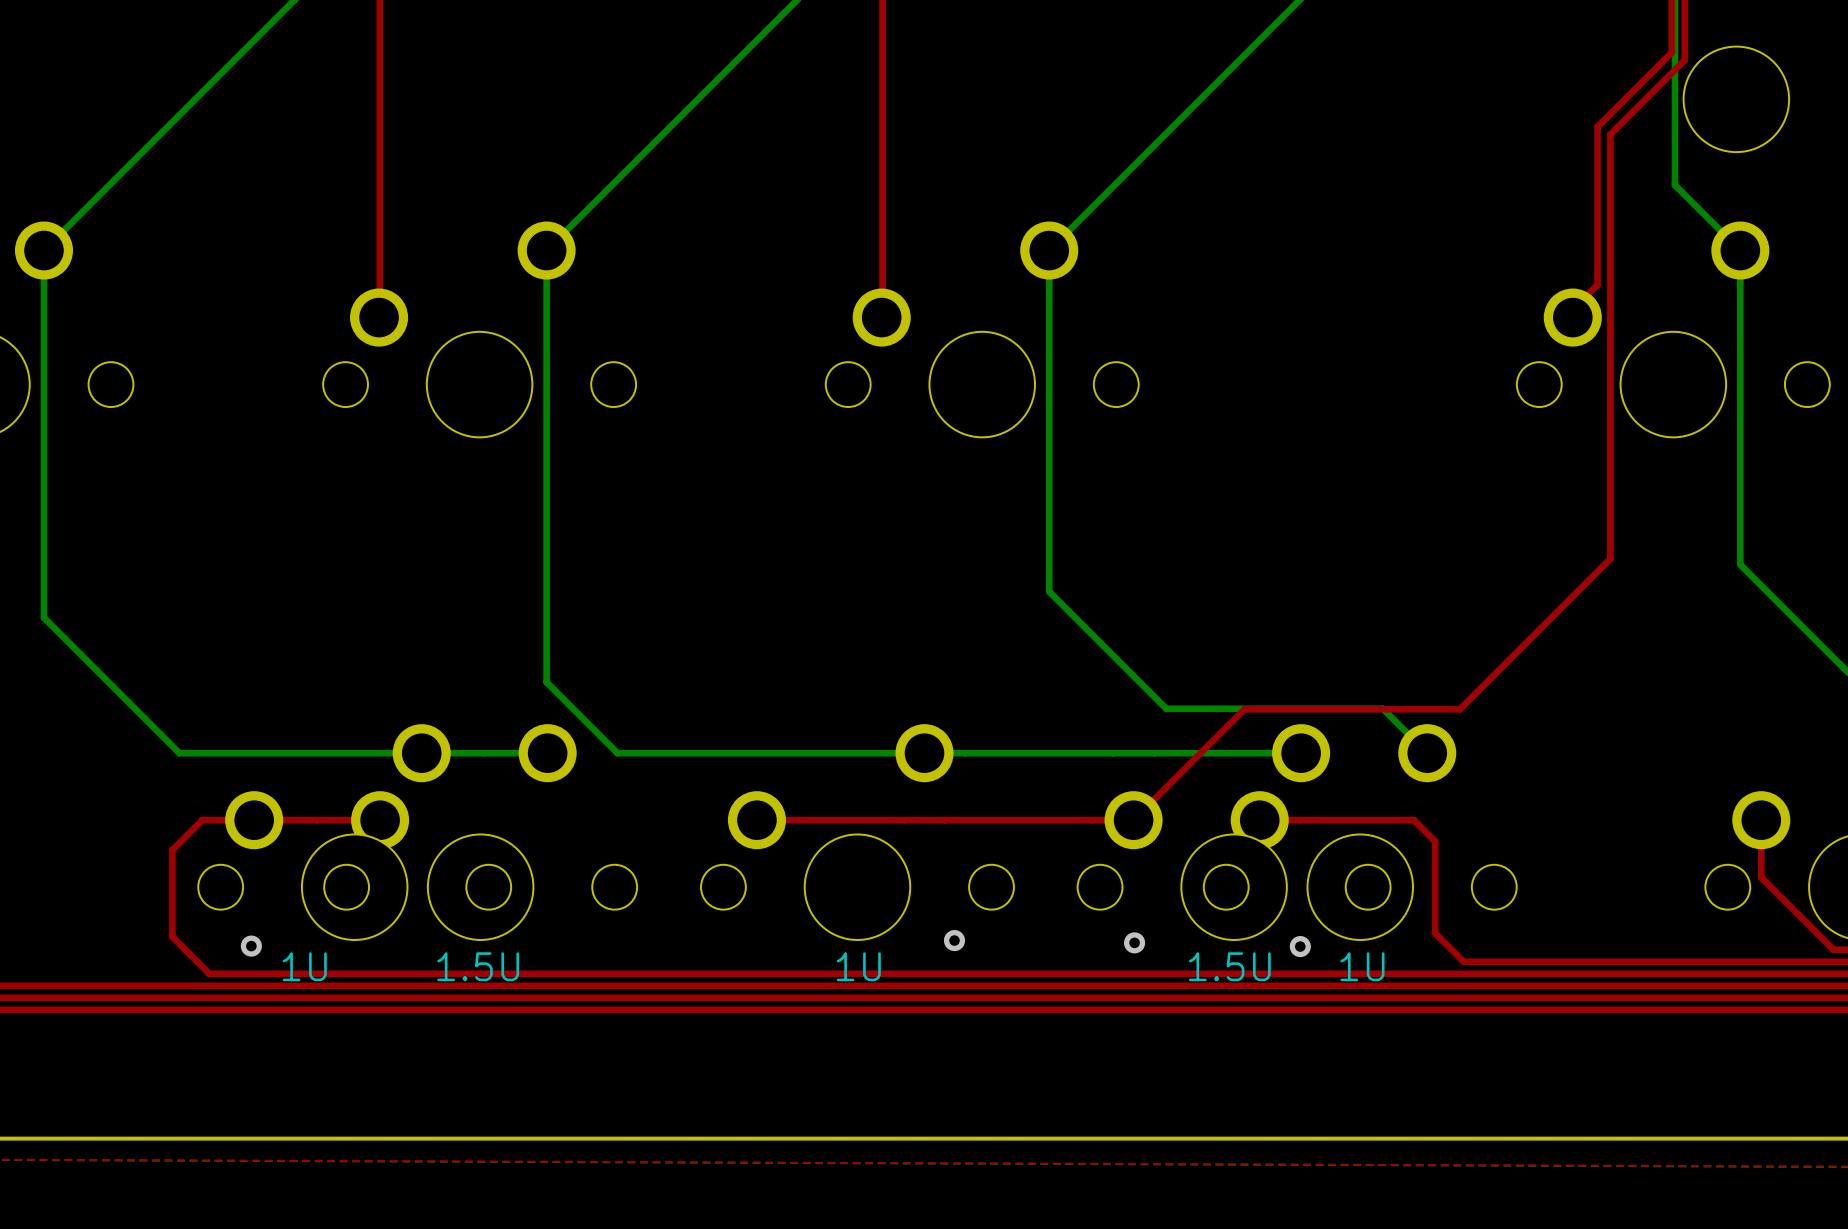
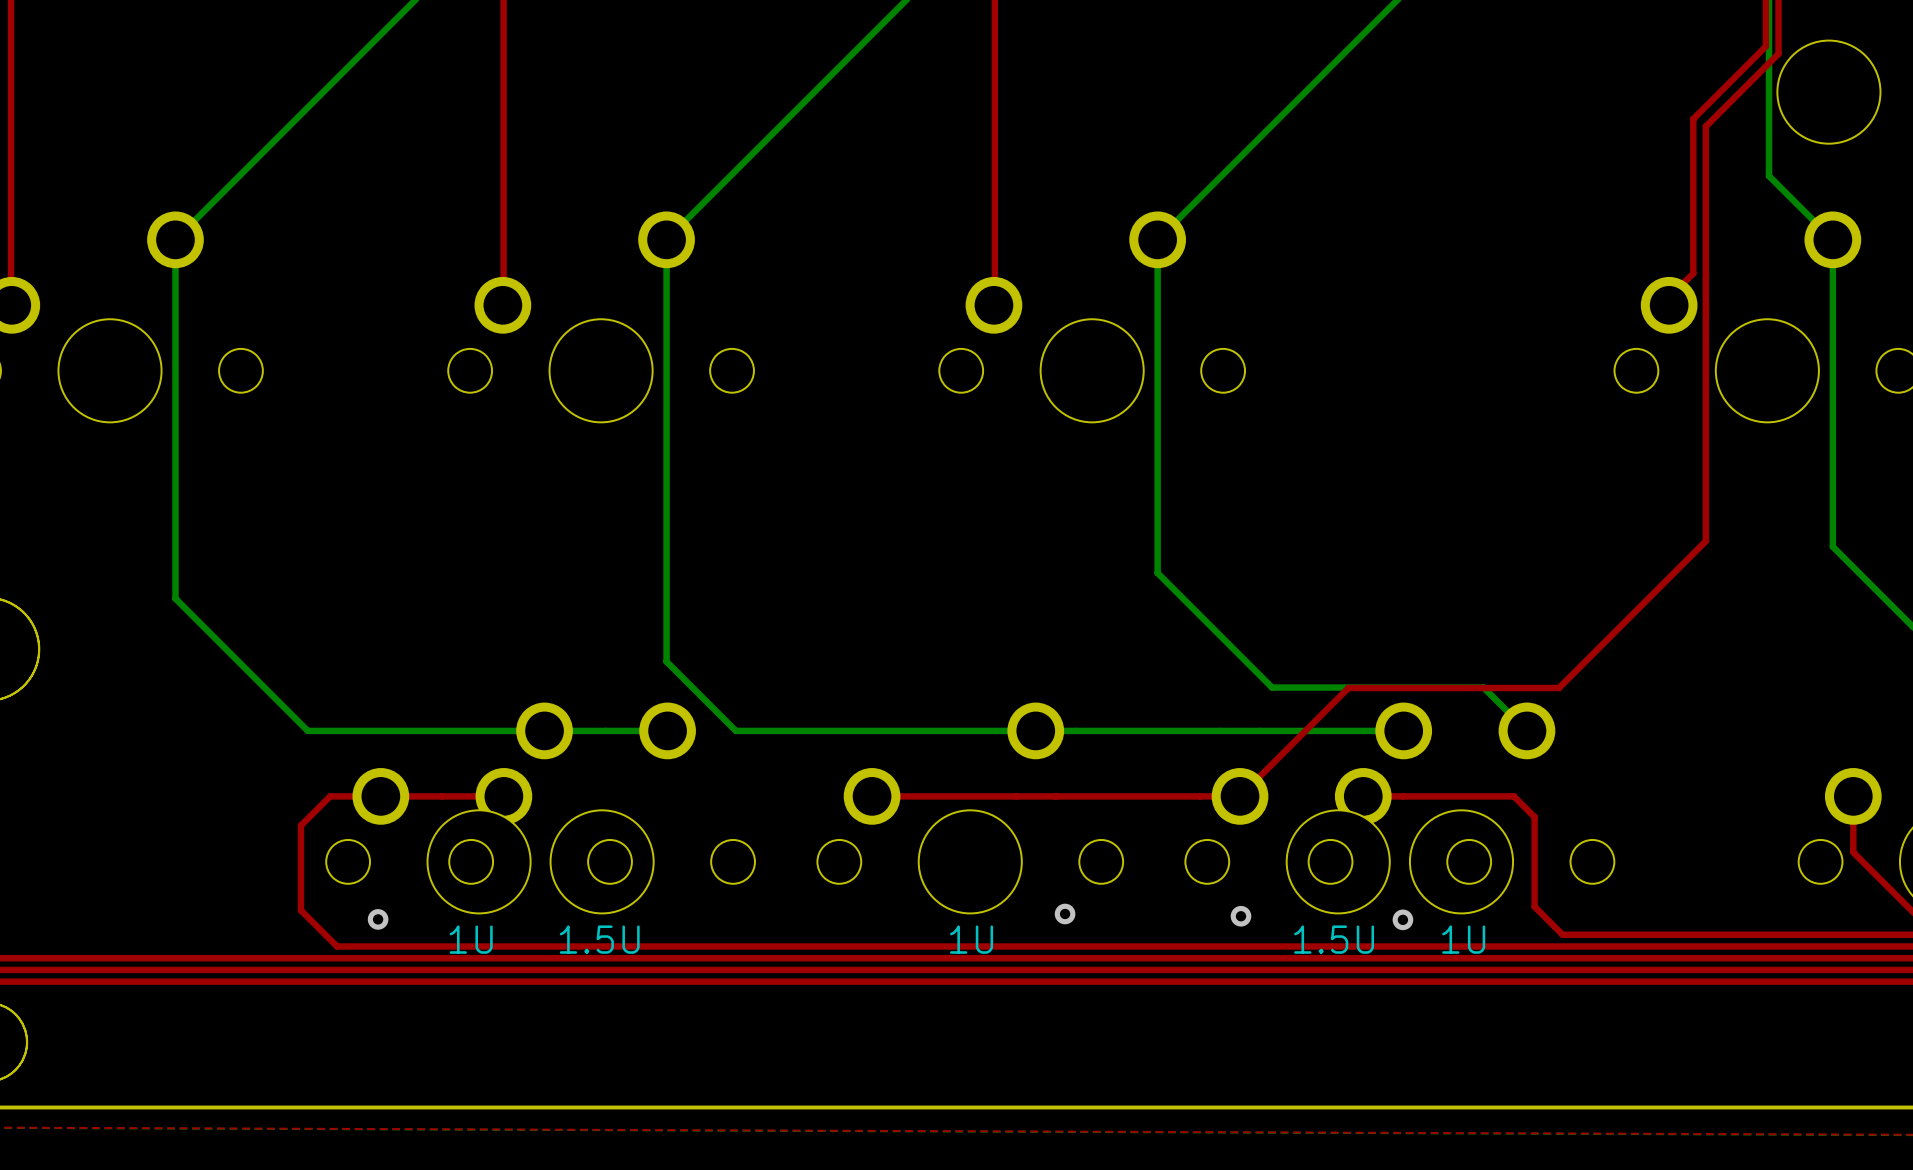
text position: 1U (304, 966) -> 1U (471, 939)

